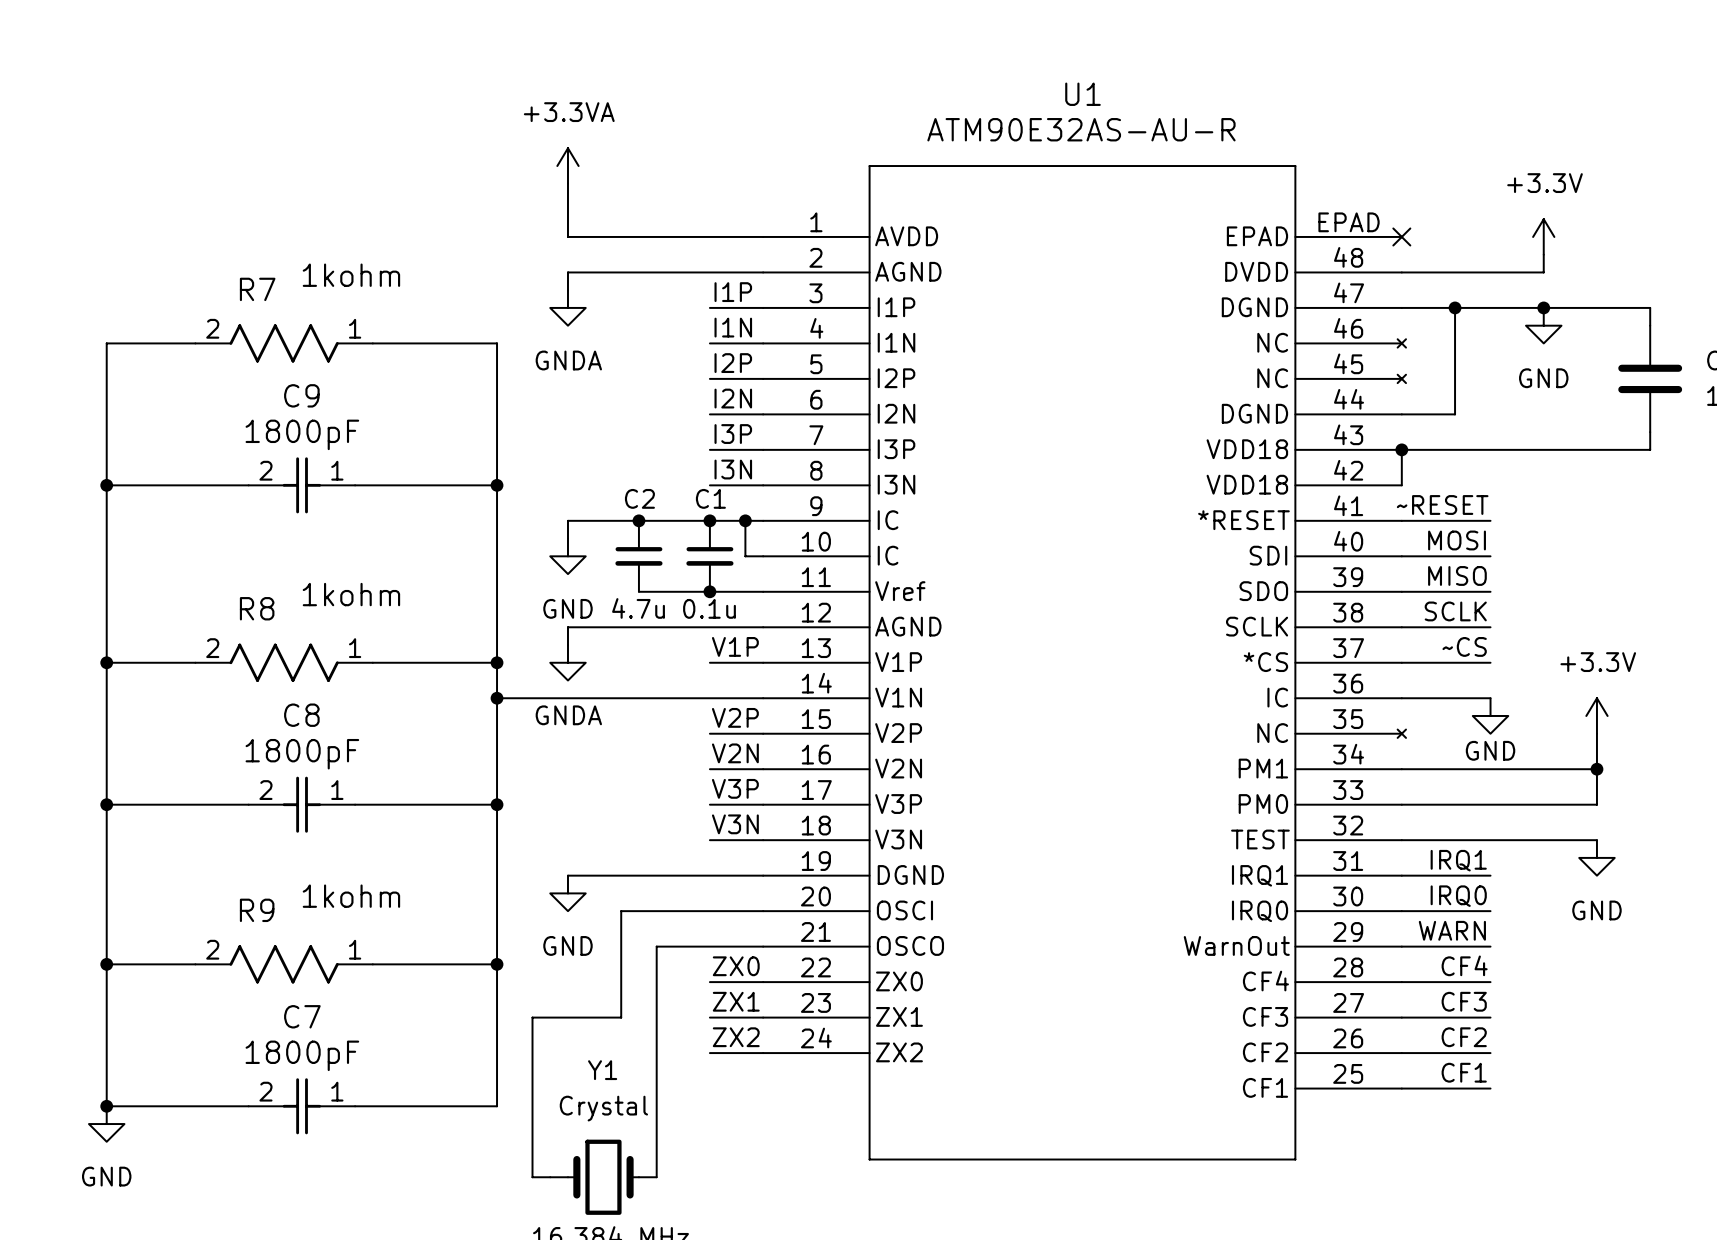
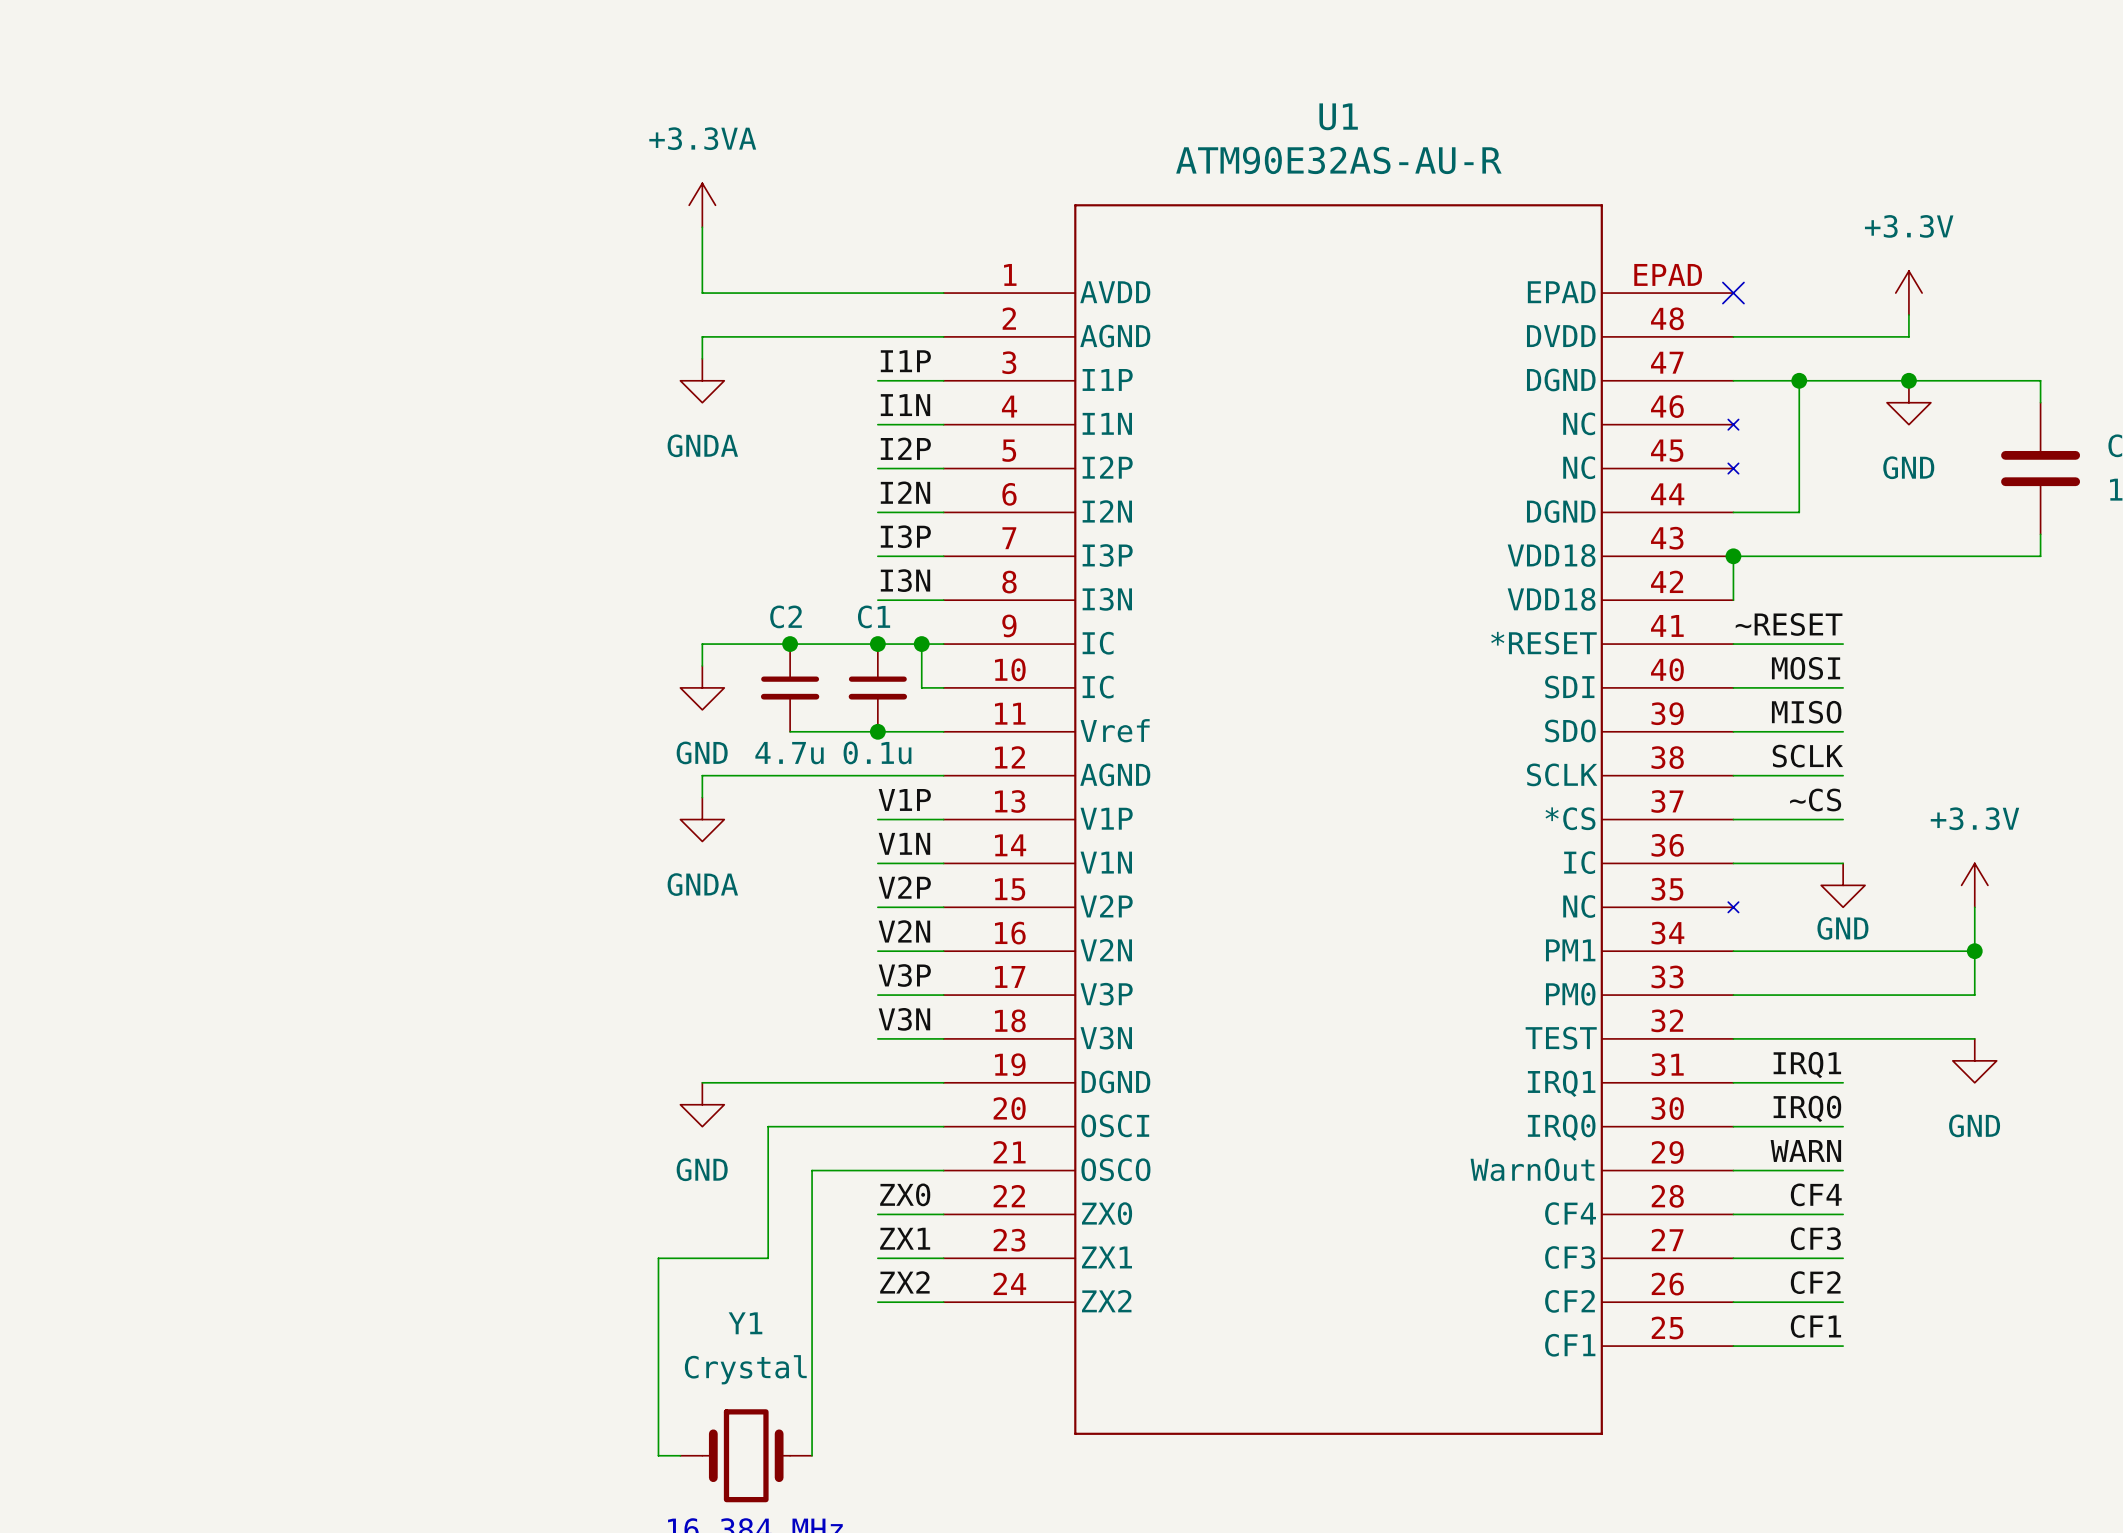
wire: (195, 343) (106, 343) (106, 1106) (248, 1106) -> none
R7: 1kohm (284, 343) -> none
wire: (372, 343) (497, 343) (497, 1106) (355, 1106) -> none
wire: (106, 485) (248, 485) -> none
junction: (106, 485) -> none
C9: 1800pF (301, 485) -> none
wire: (355, 485) (497, 485) -> none
junction: (497, 485) -> none
wire: (106, 662) (195, 662) -> none
junction: (106, 662) -> none
R8: 1kohm (284, 662) -> none
wire: (372, 662) (497, 662) -> none
junction: (497, 662) -> none
label: none -> V1N (904, 843)
wire: (497, 698) (709, 698) -> none
junction: (497, 698) -> none
wire: (106, 804) (248, 804) -> none
junction: (106, 804) -> none
C8: 1800pF (301, 804) -> none
wire: (355, 804) (497, 804) -> none
junction: (497, 804) -> none
wire: (106, 964) (195, 964) -> none
junction: (106, 964) -> none
R9: 1kohm (284, 964) -> none
wire: (372, 964) (497, 964) -> none
junction: (497, 964) -> none
junction: (106, 1106) -> none
C7: 1800pF (301, 1106) -> none
power symbol: GND (106, 1124) -> none

